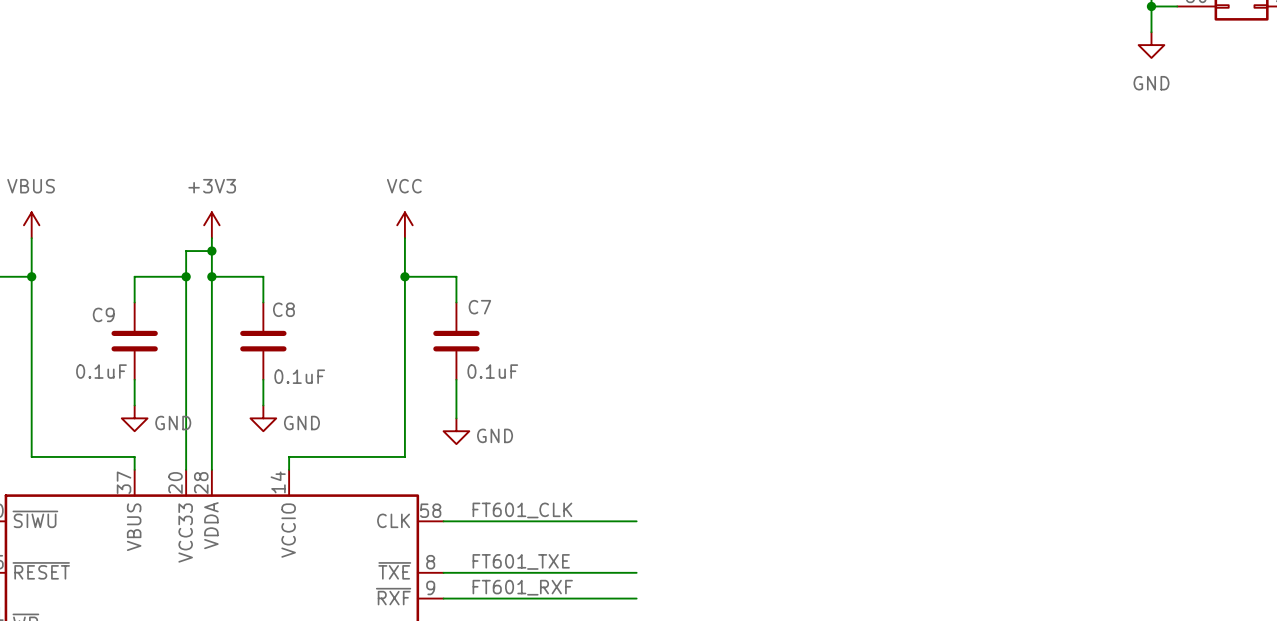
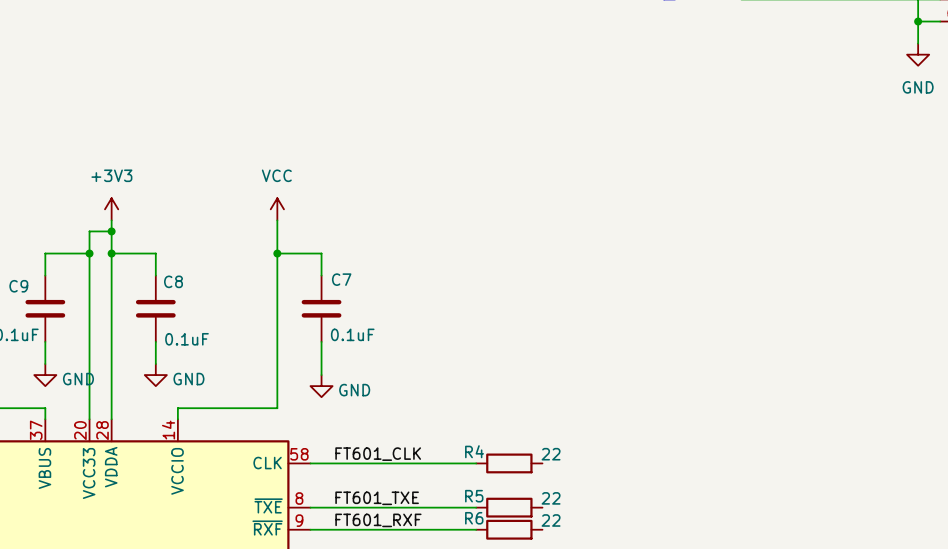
R4: none -> 22 (509, 463)
R5: none -> 22 (509, 507)
R6: none -> 22 (509, 529)

